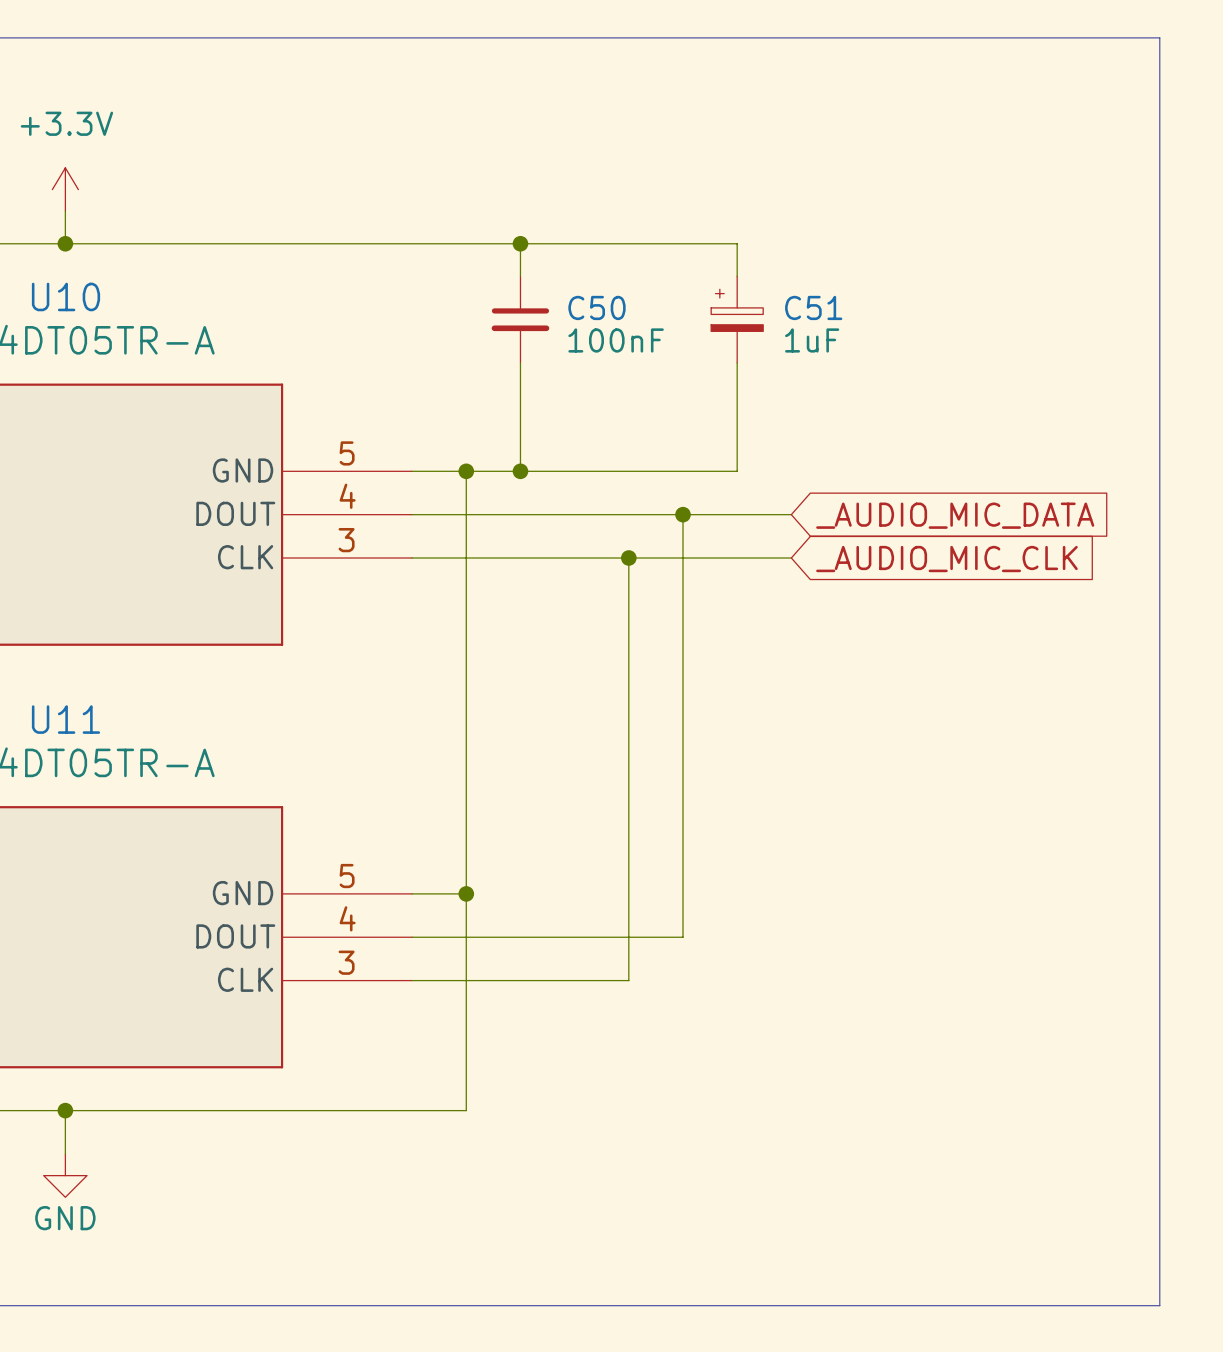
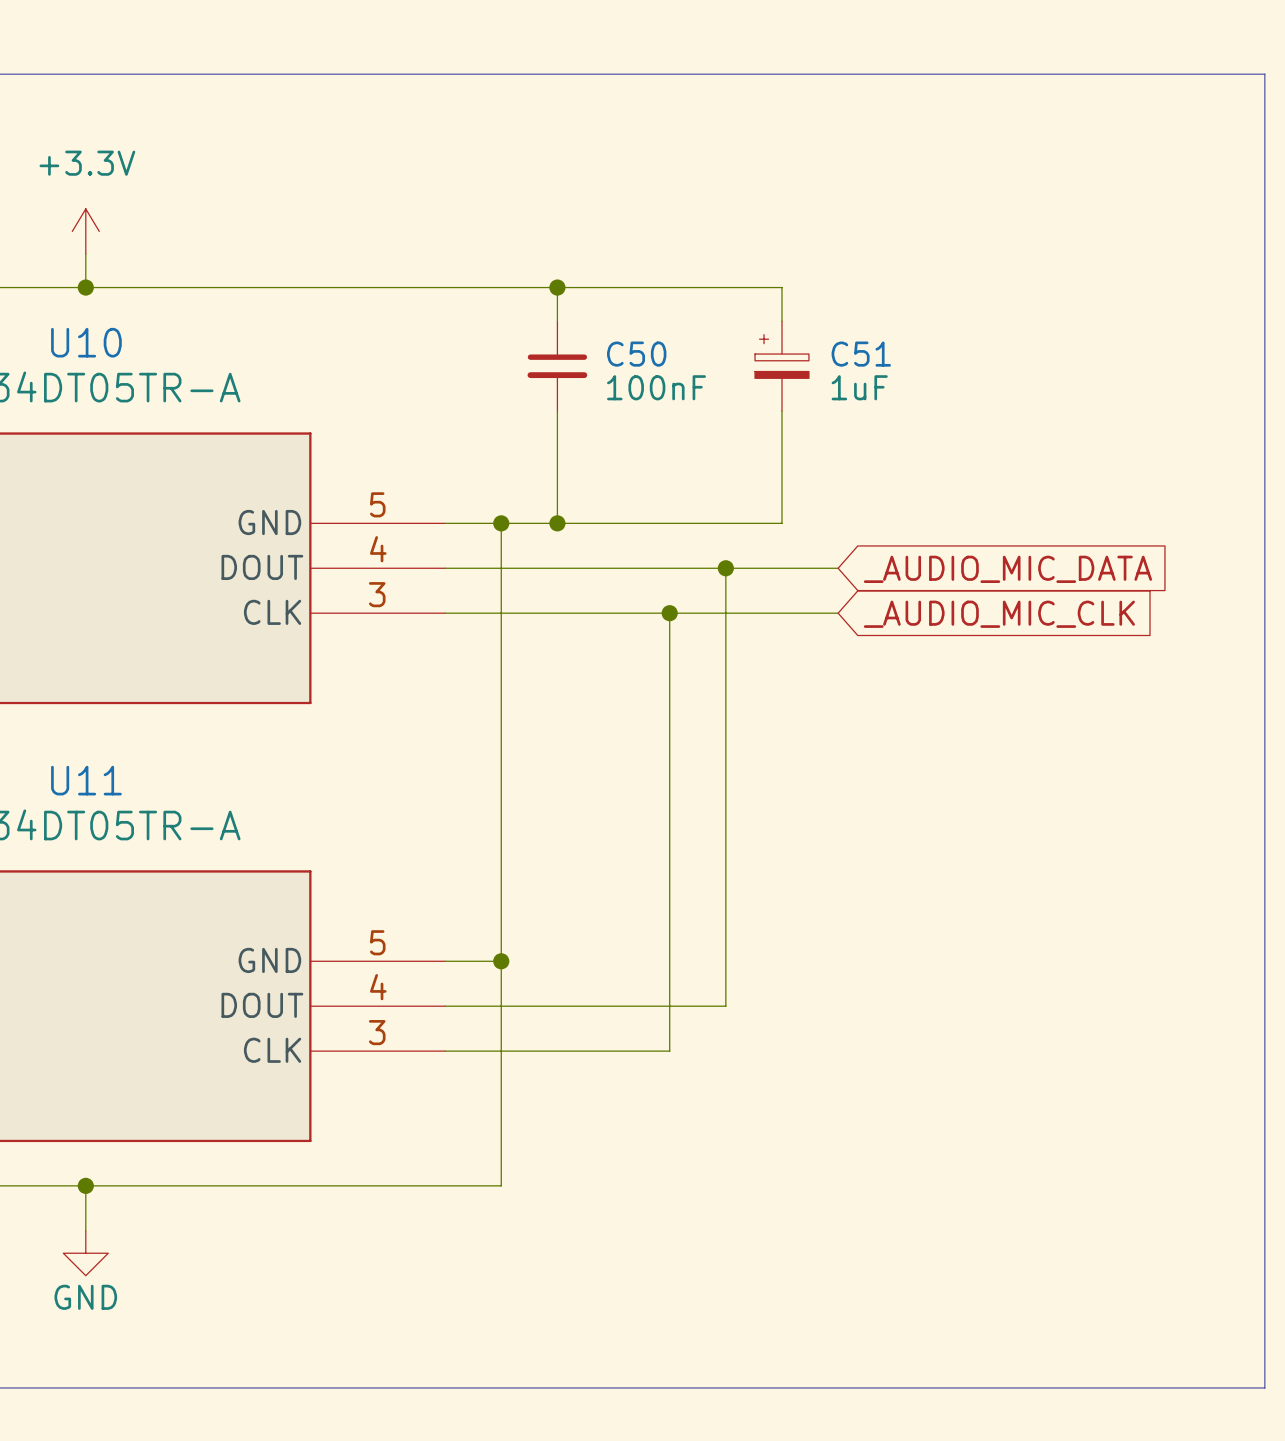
line: (1159, 37) (1159, 1305) -> (1219, 74) (1264, 74) (1264, 1387) (1219, 1387)

